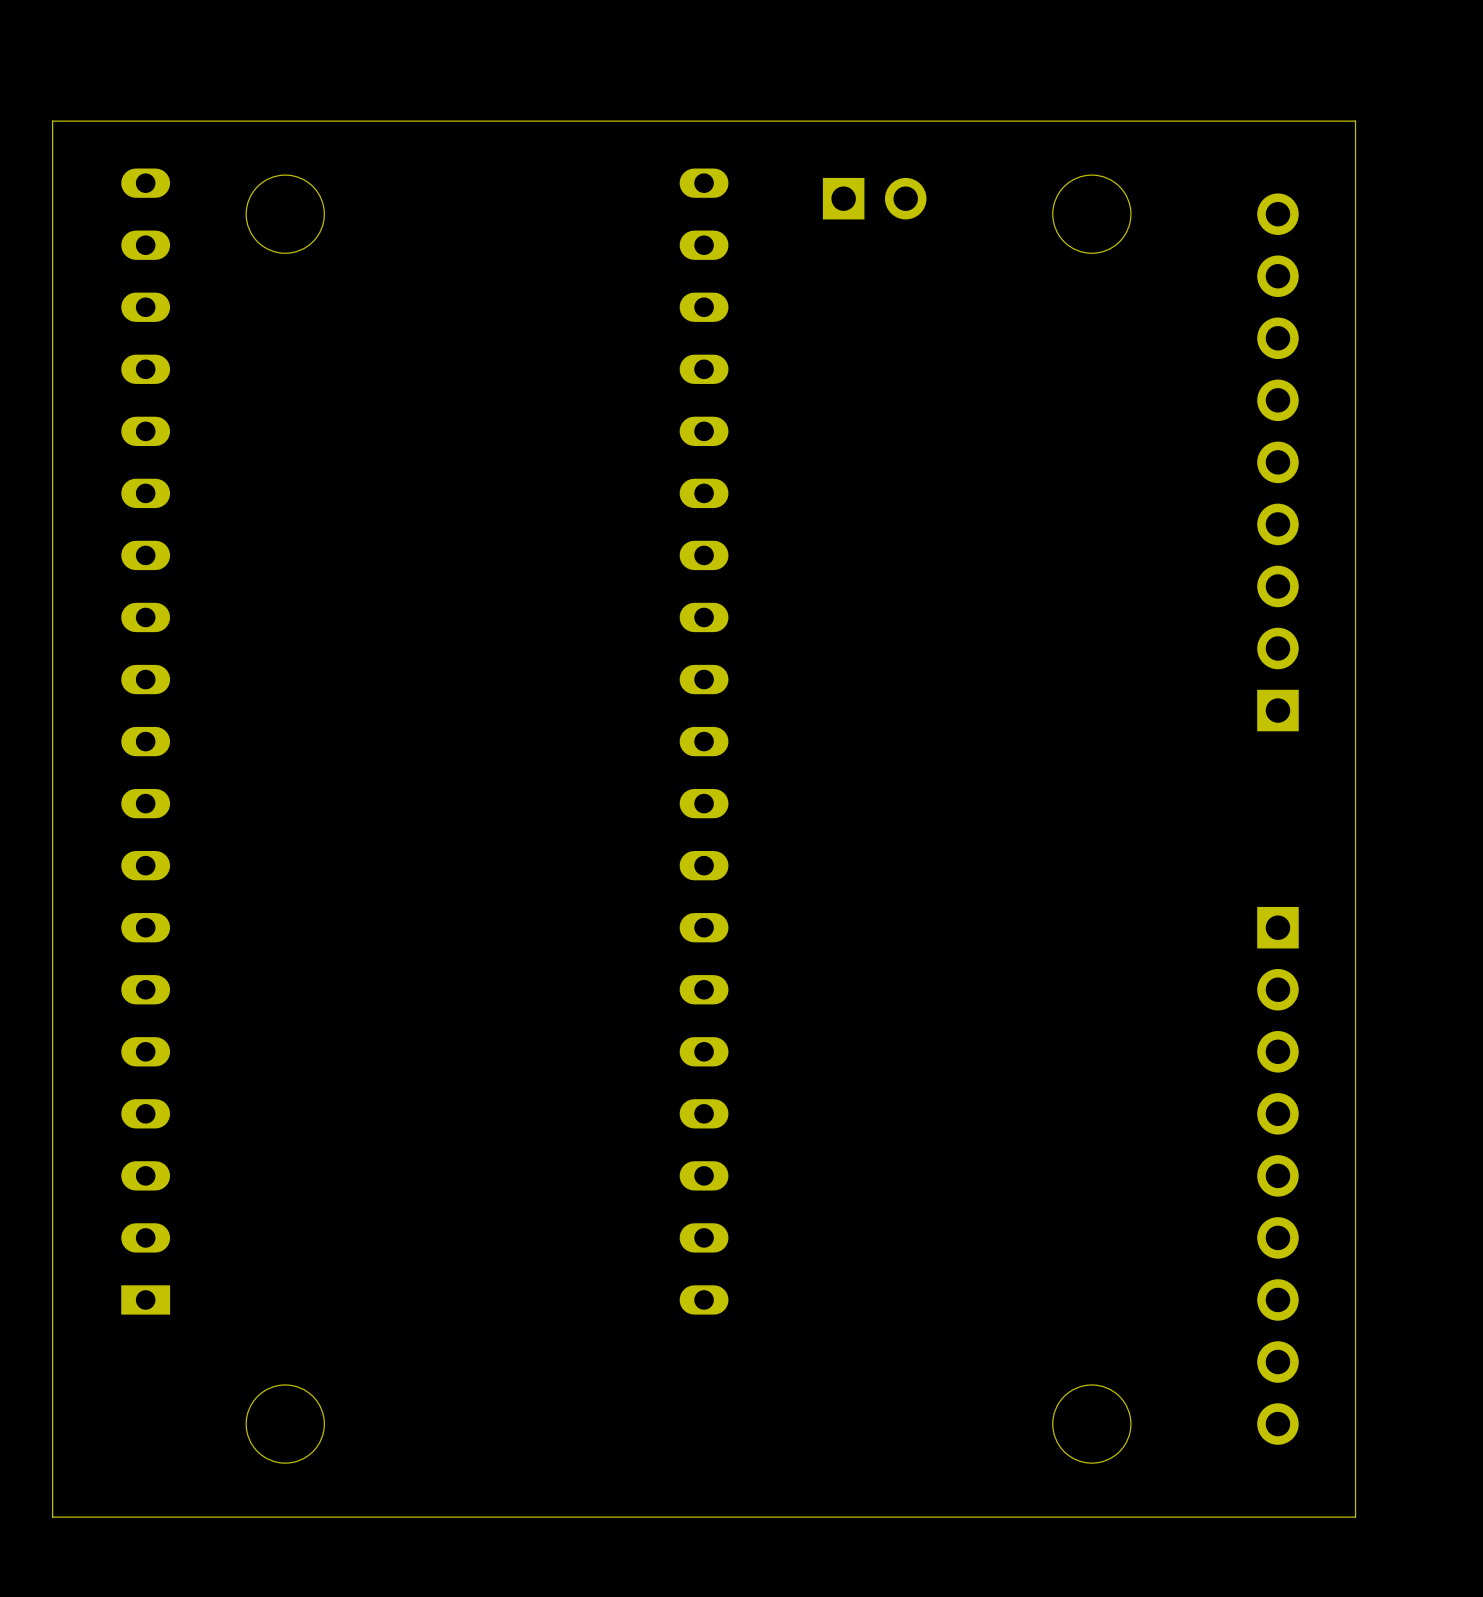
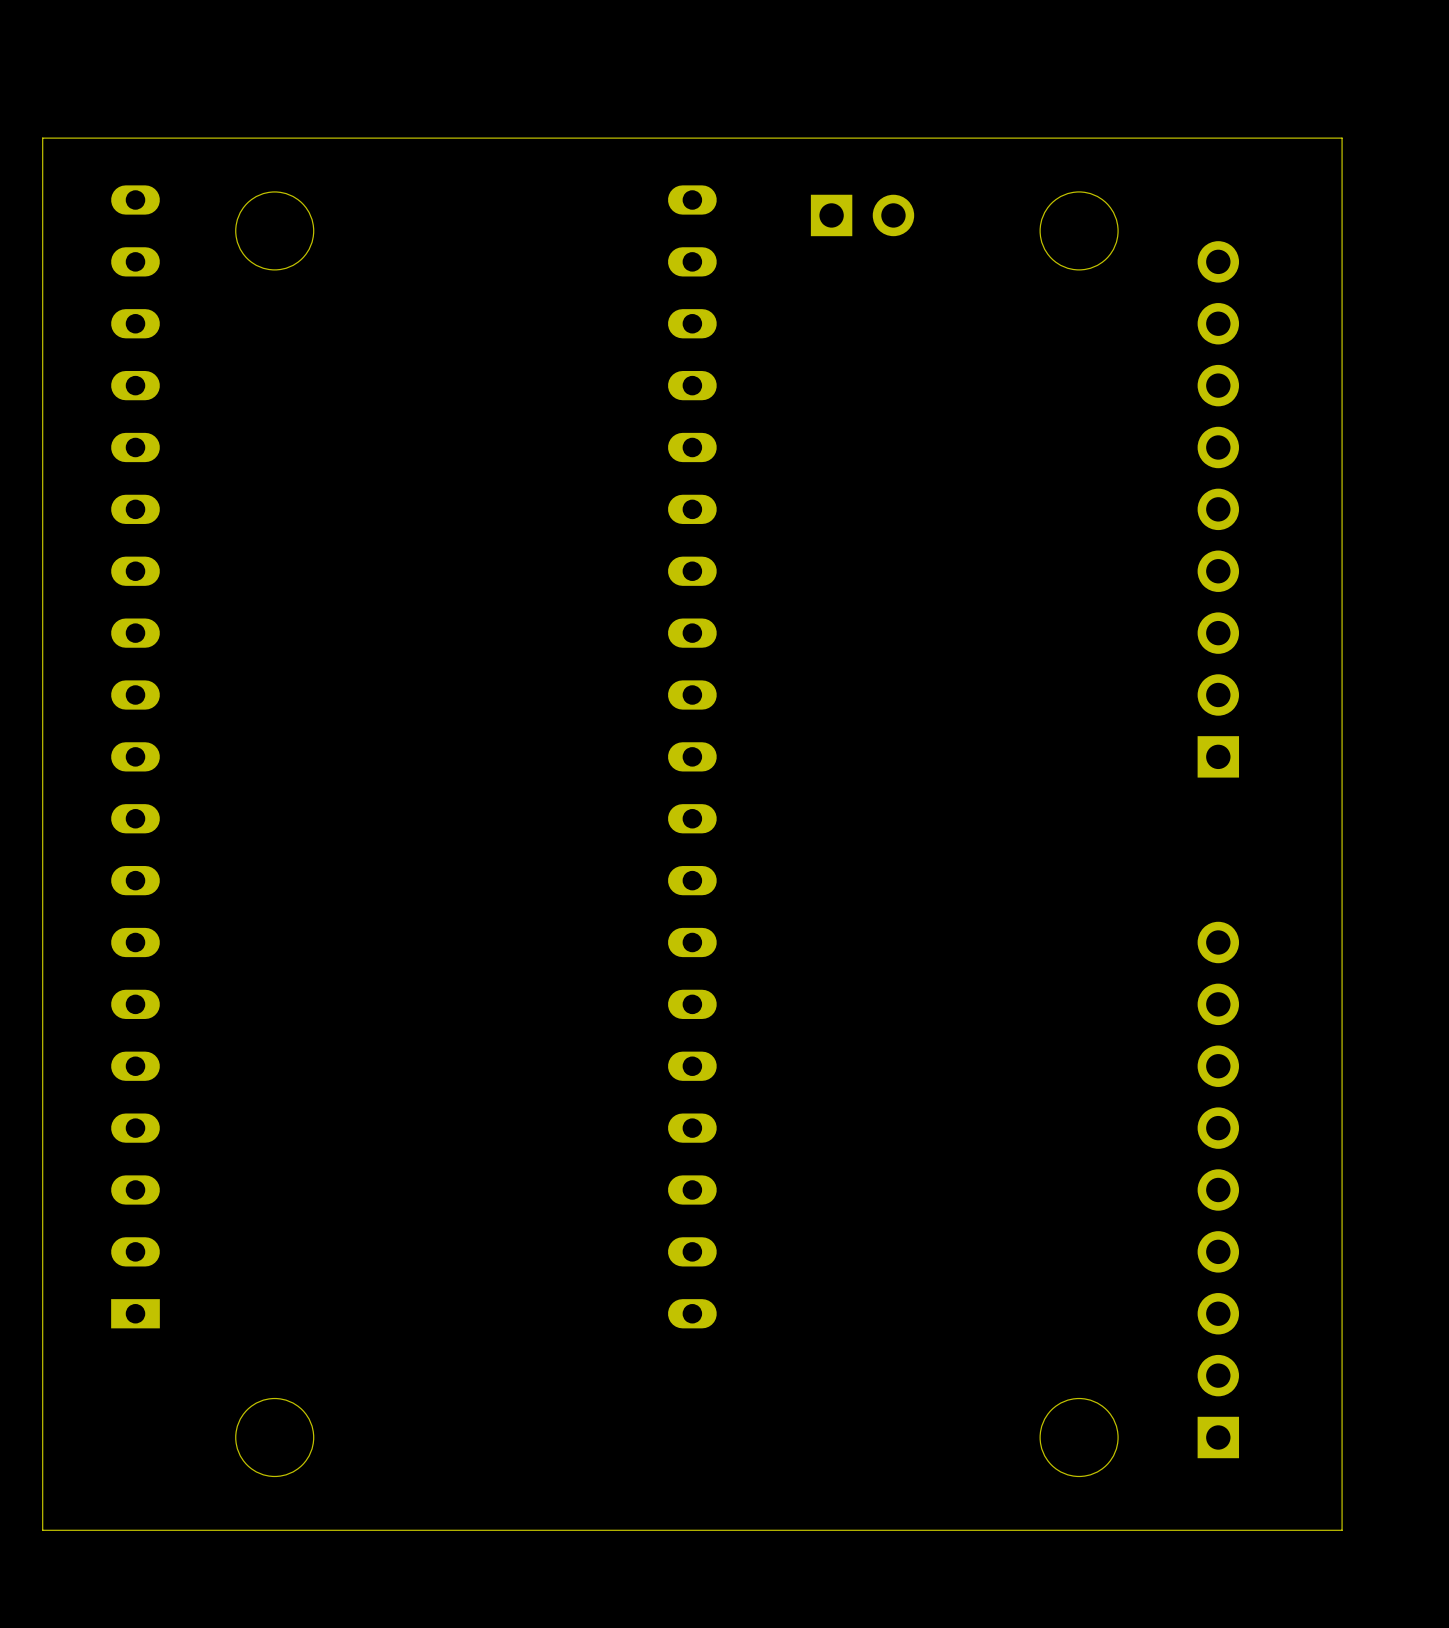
part position: (1277, 462) -> (1218, 509)
part rotation: 0° (1277, 1175) -> 180° (1218, 1189)

